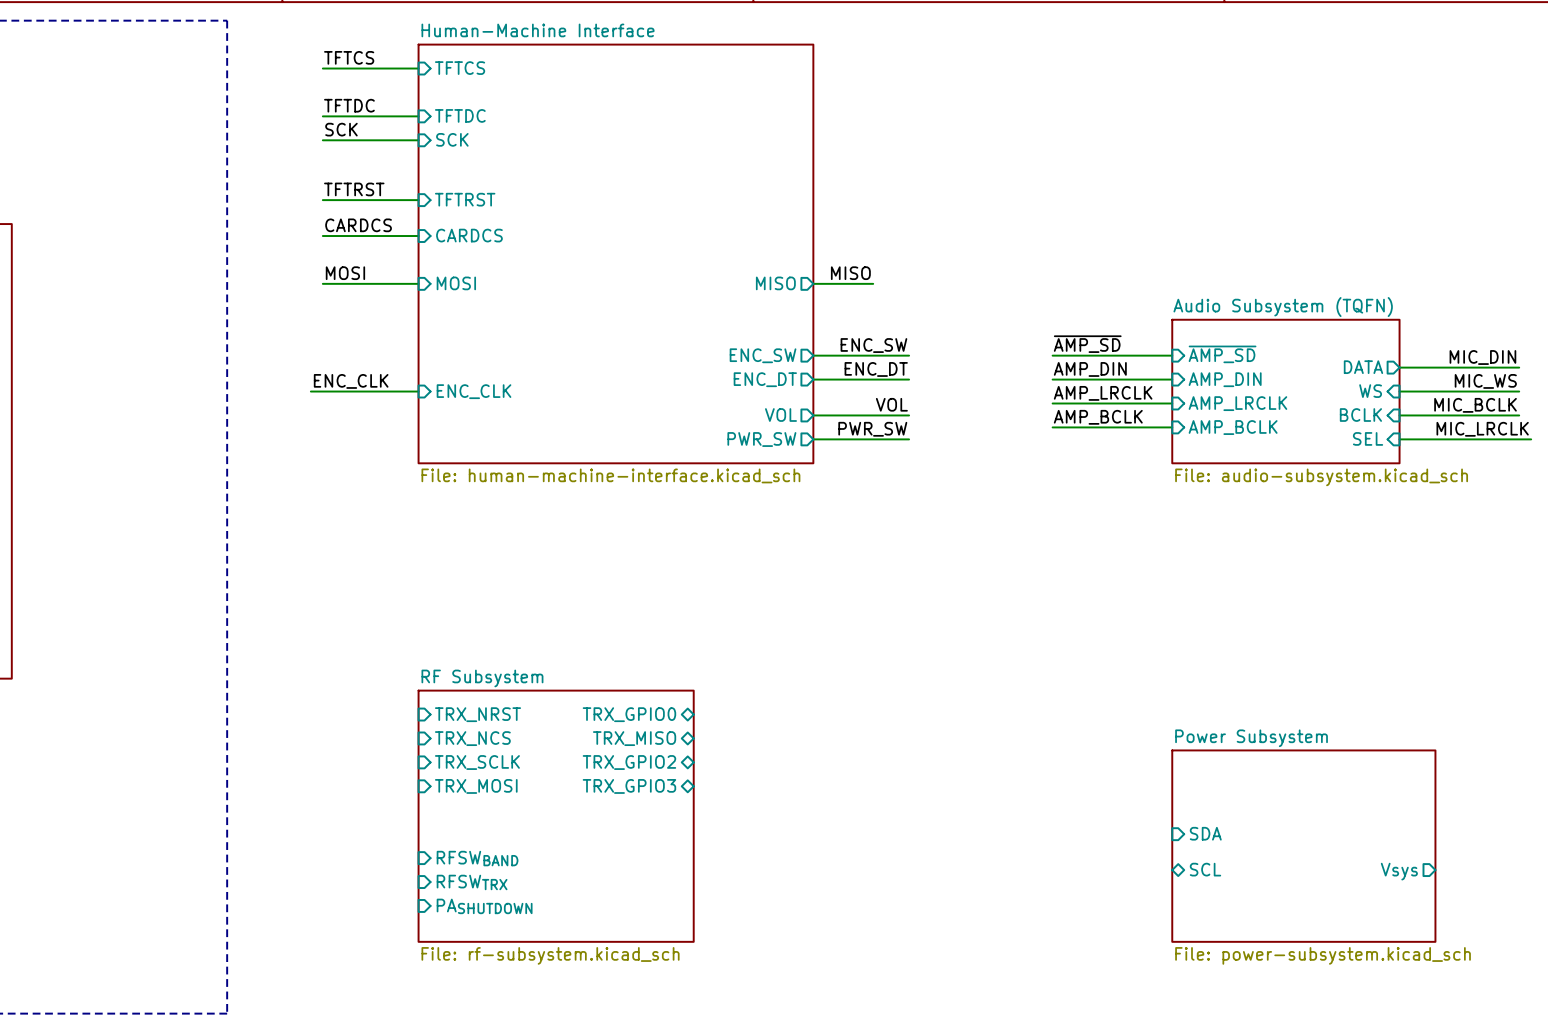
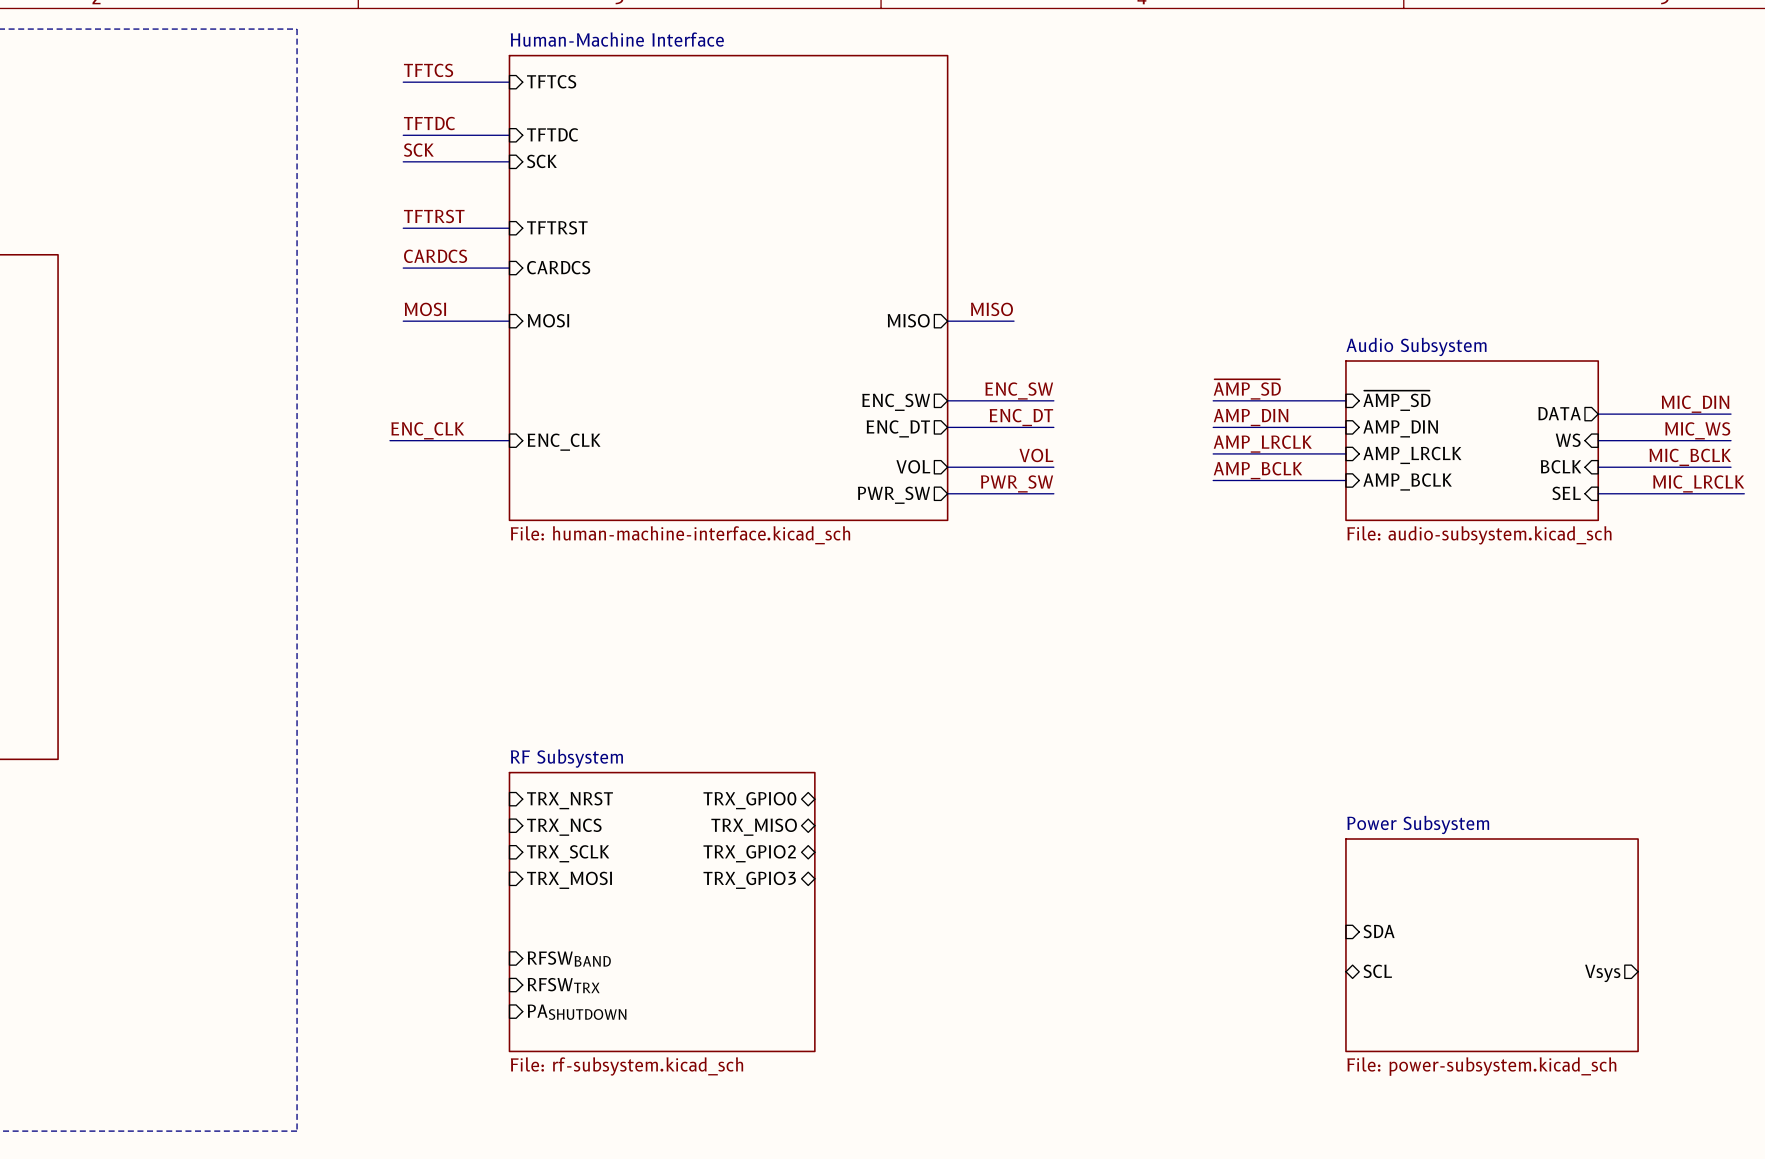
sheet Audio Subsystem (TQFN) name: Audio Subsystem (TQFN) (1283, 307) -> Audio Subsystem (1416, 346)

